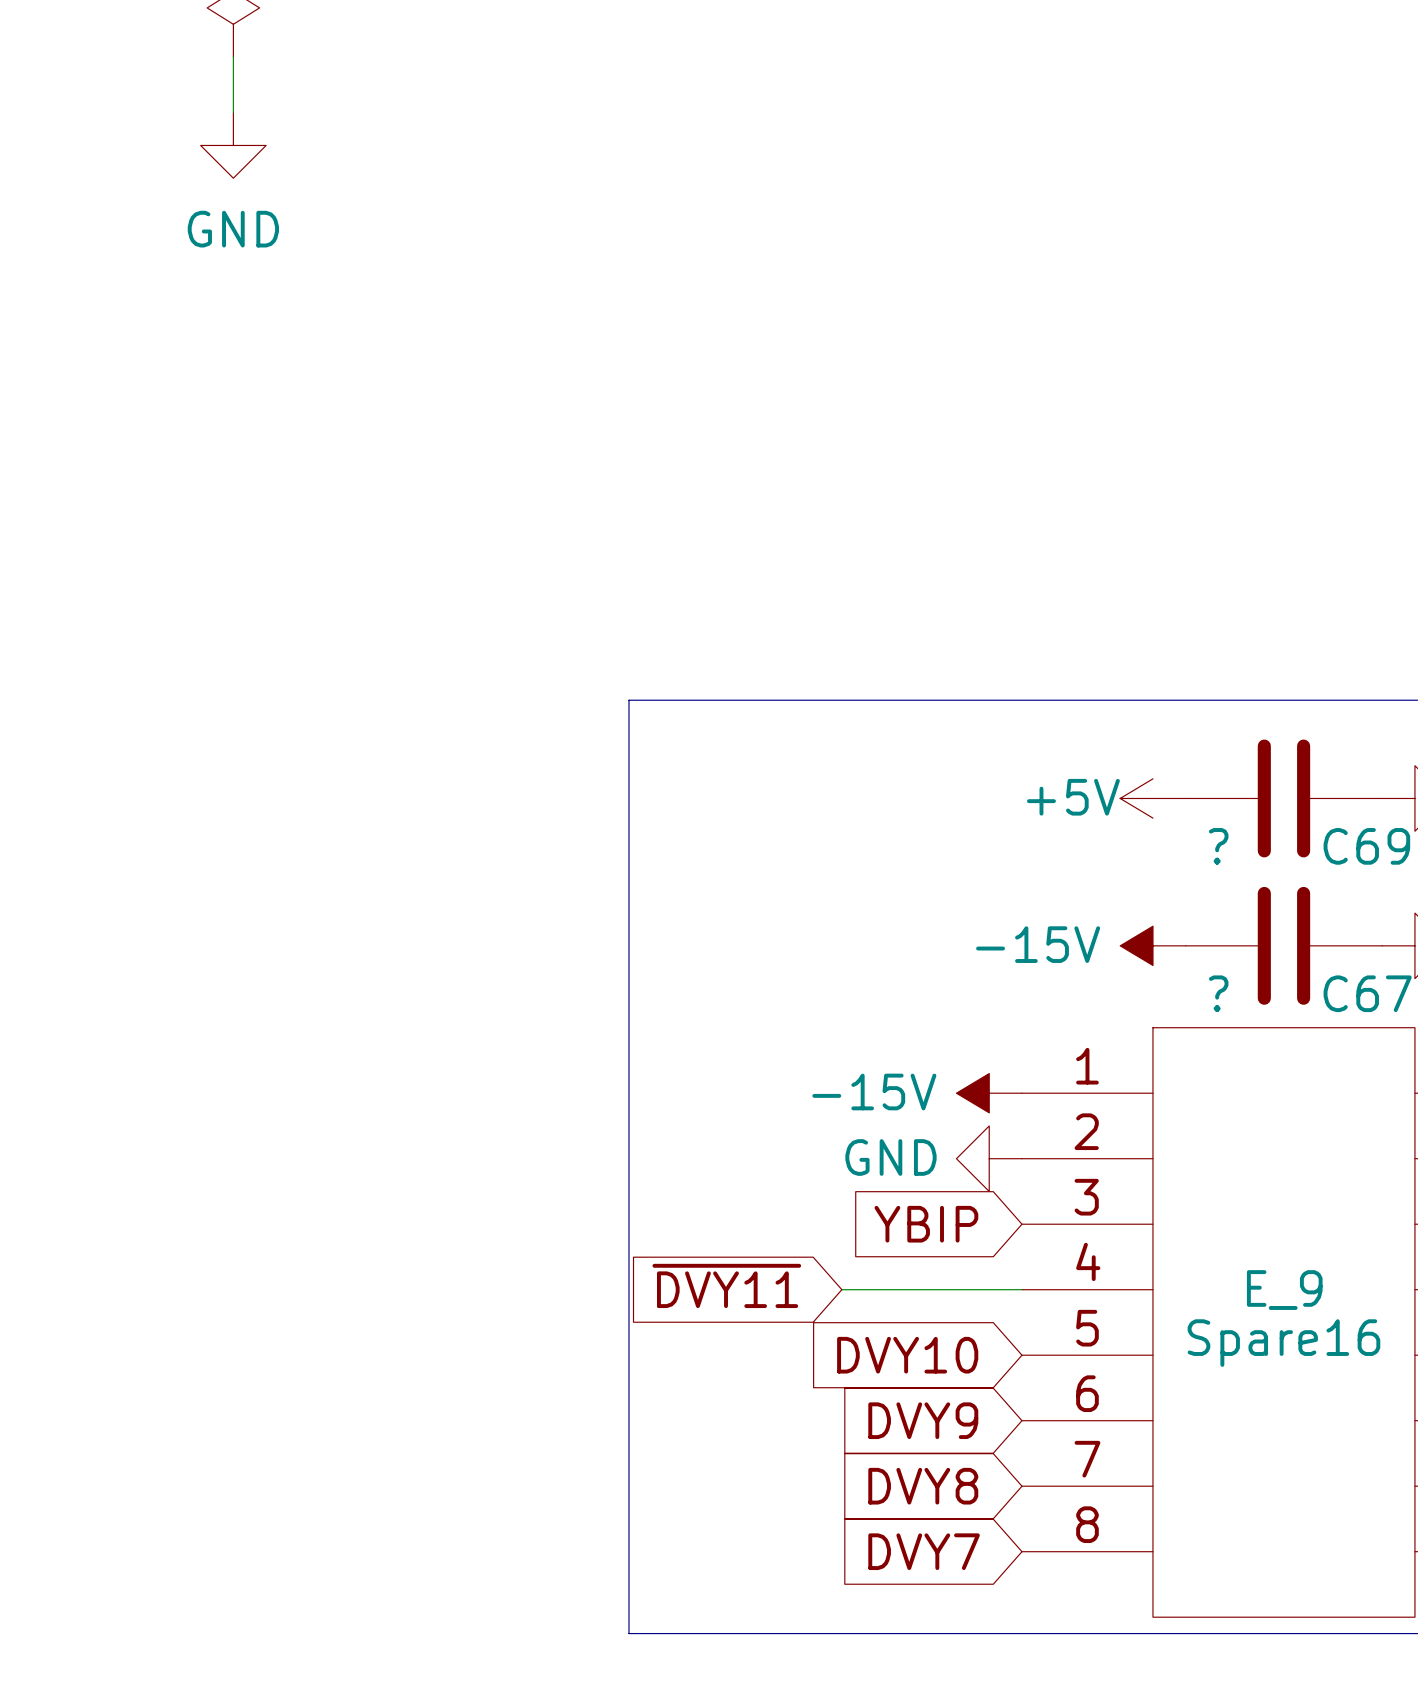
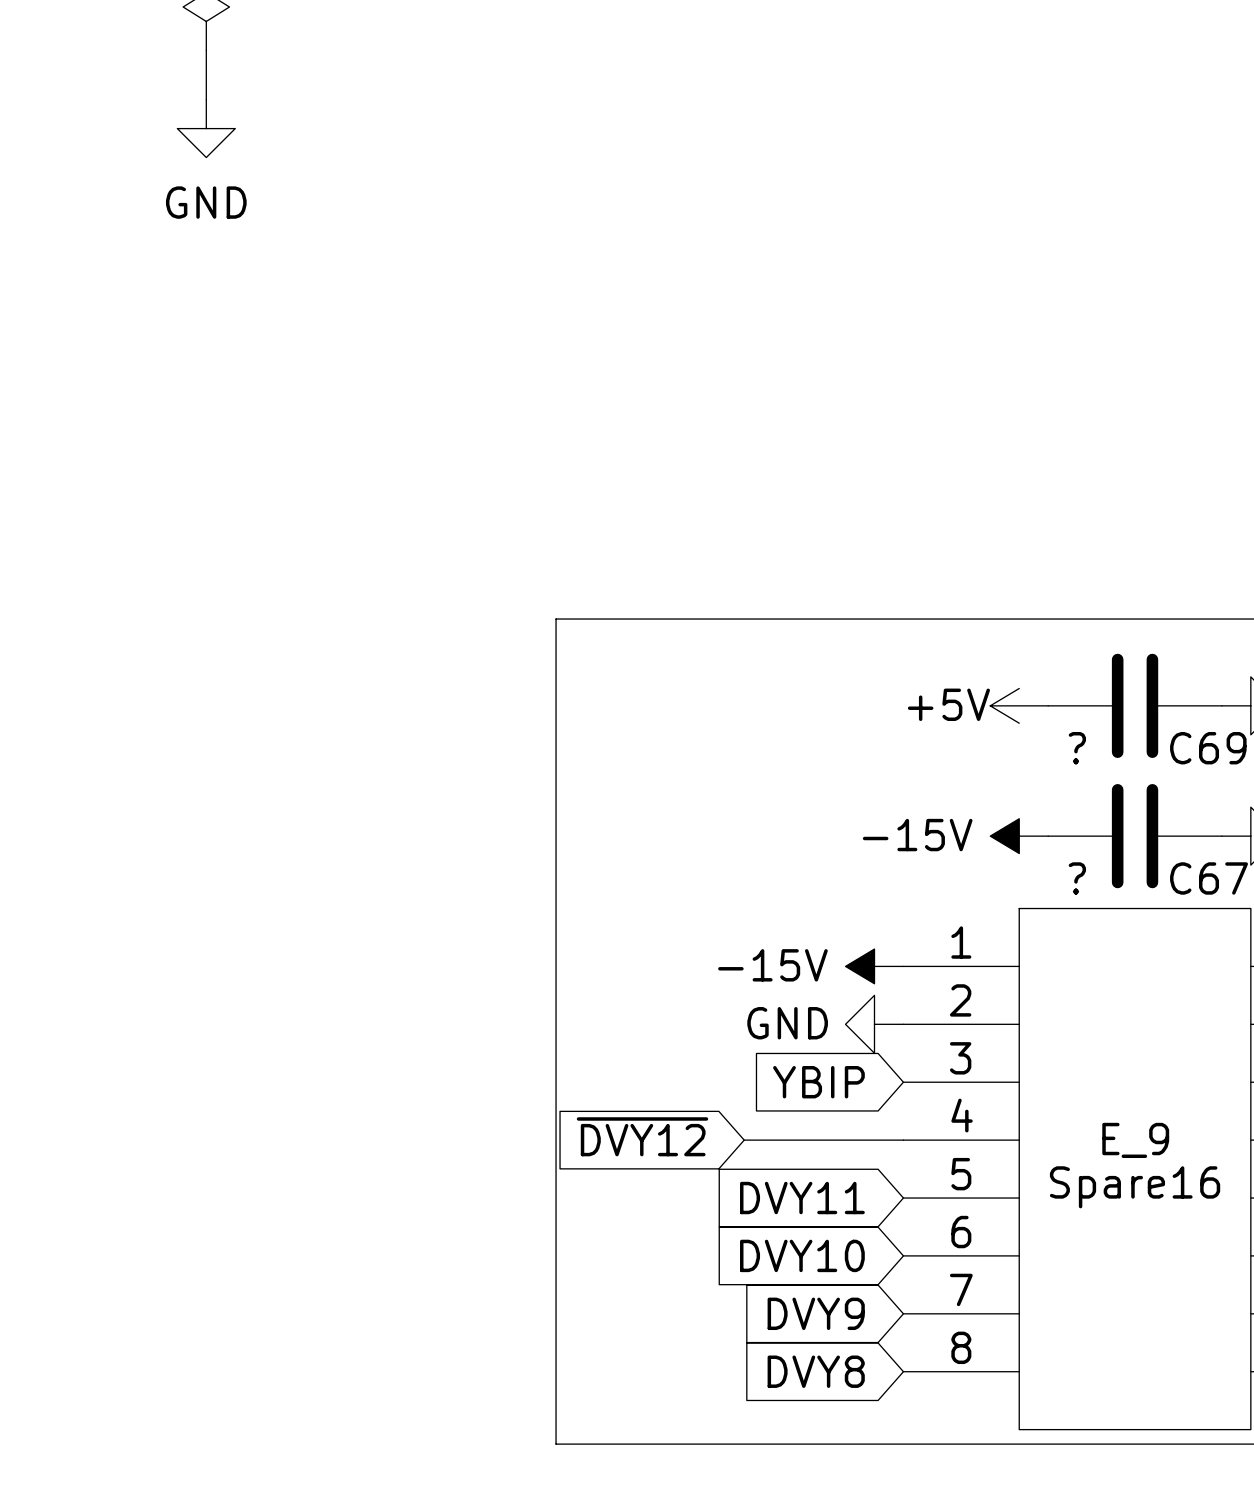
global label: ~{DVY11} (726, 1285) -> ~{DVY12} (642, 1136)
global label: DVY10 (907, 1355) -> DVY11 (802, 1198)
global label: DVY9 (923, 1420) -> DVY10 (802, 1255)
global label: DVY8 (923, 1486) -> DVY9 (816, 1313)
global label: DVY7 (924, 1551) -> DVY8 (816, 1371)

